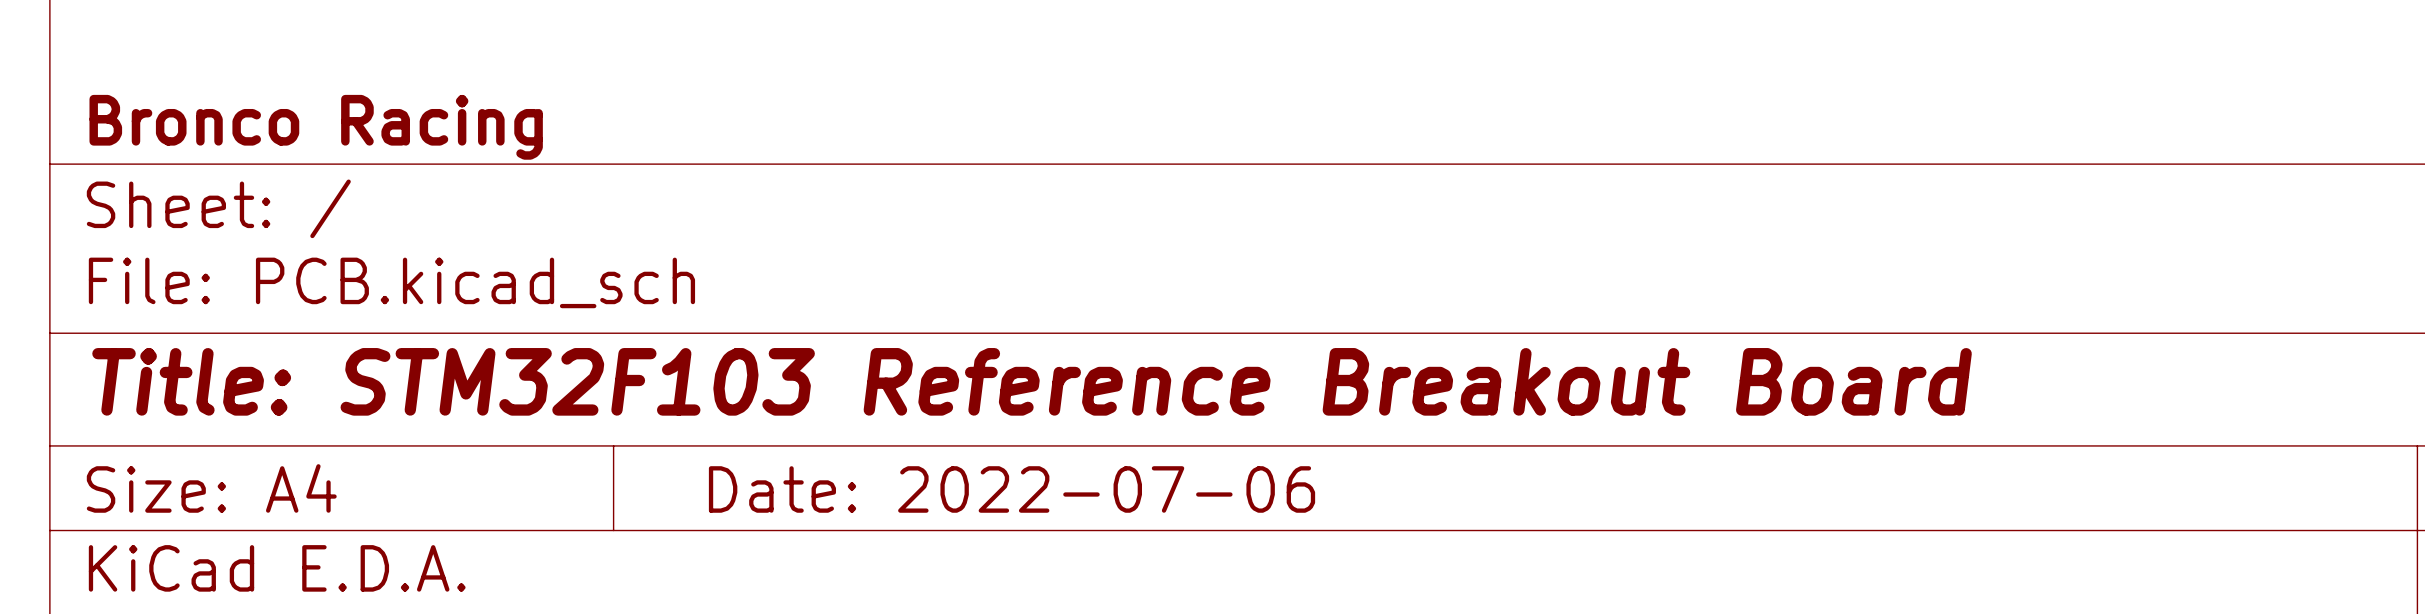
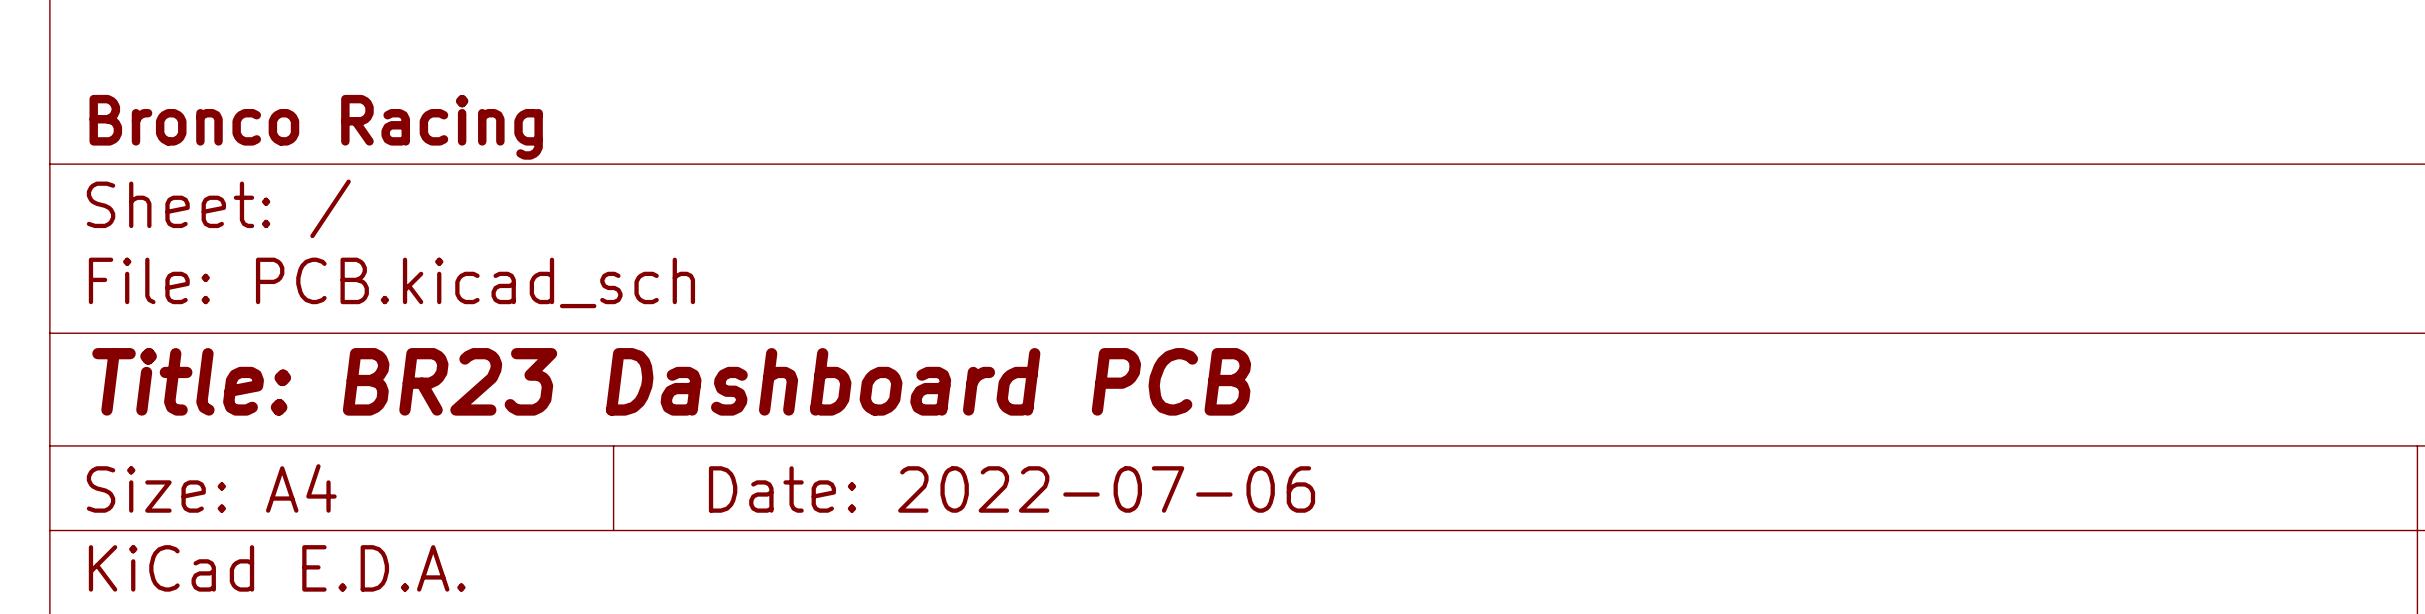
title block: Title: STM32F103 Reference Breakout Board (1032, 381) -> Title: BR23 Dashboard PCB (671, 381)

